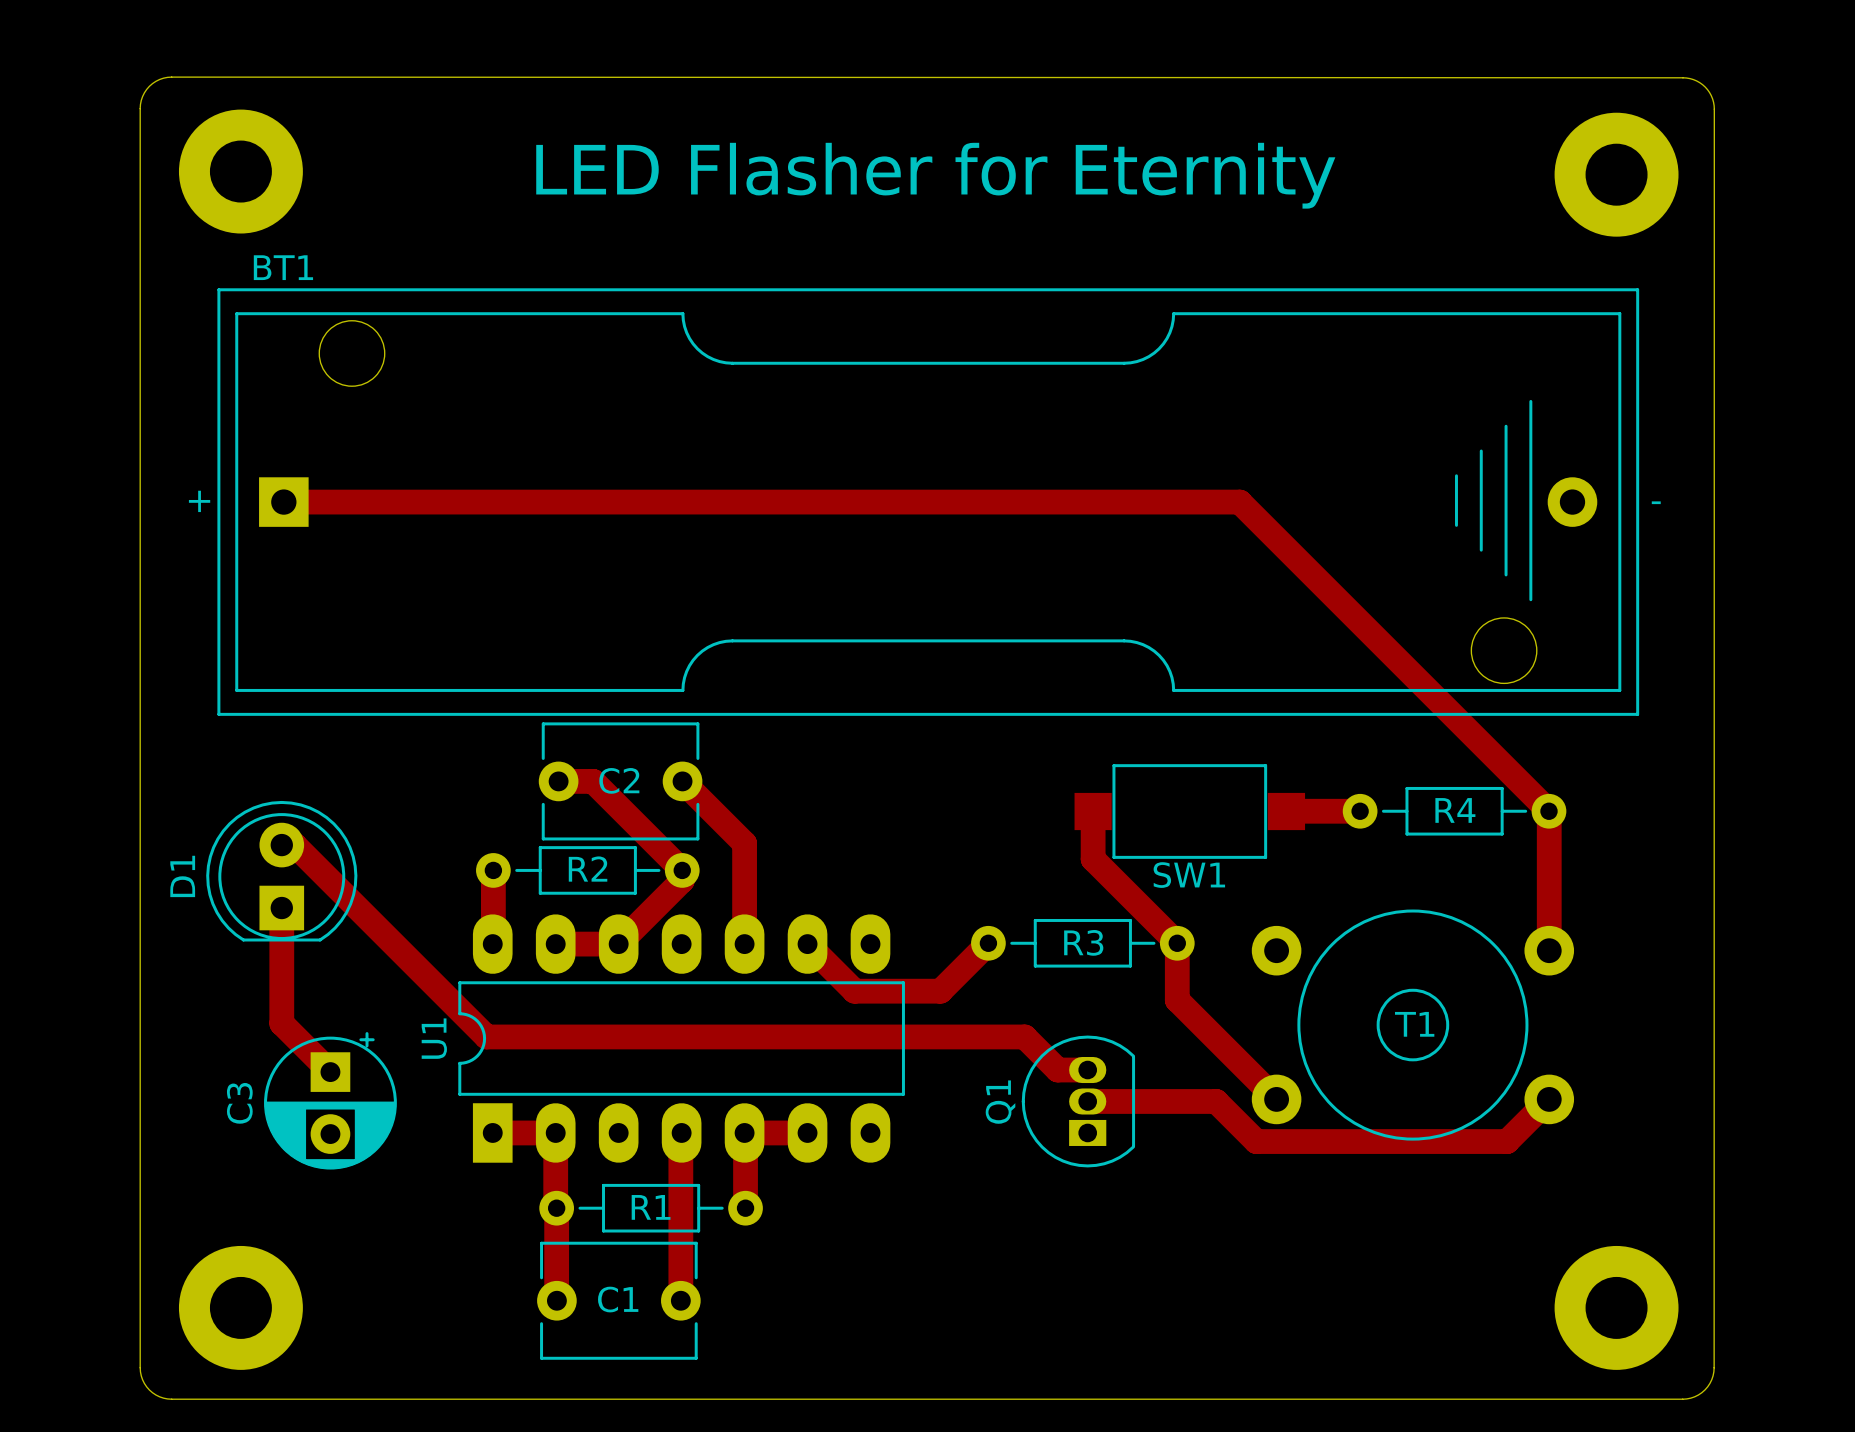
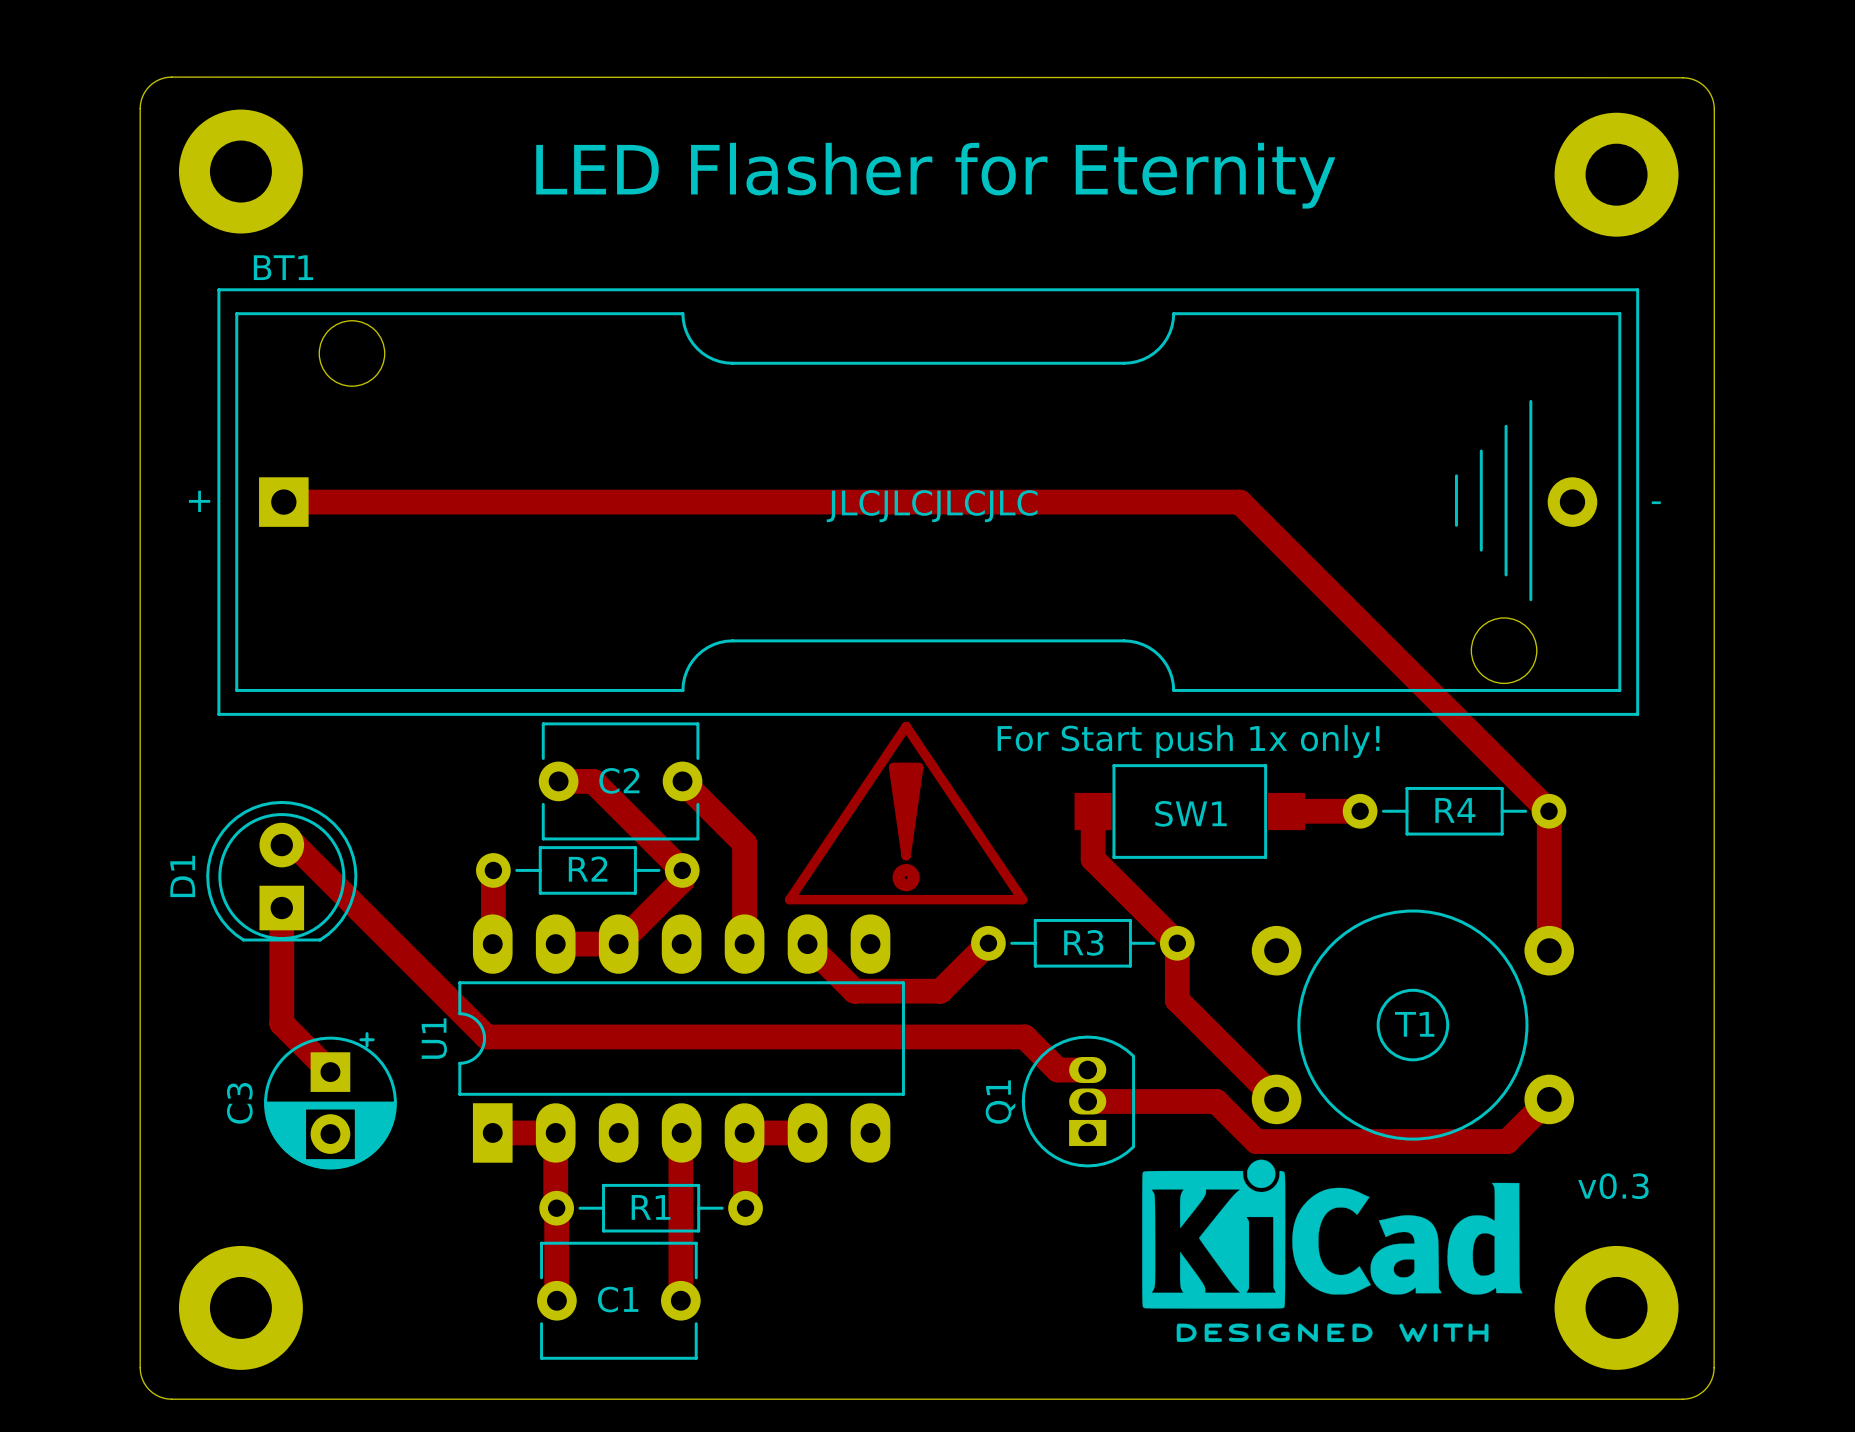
text: none -> JLCJLCJLCJLC (932, 506)
drawing: none -> [784, 721, 1028, 905]
text: none -> For Start push 1x only! (1188, 741)
SW1 name position: SW1 (1189, 875) -> SW1 (1191, 813)
drawing: none -> [1142, 1159, 1523, 1343]
text: none -> v0.3 (1613, 1186)

